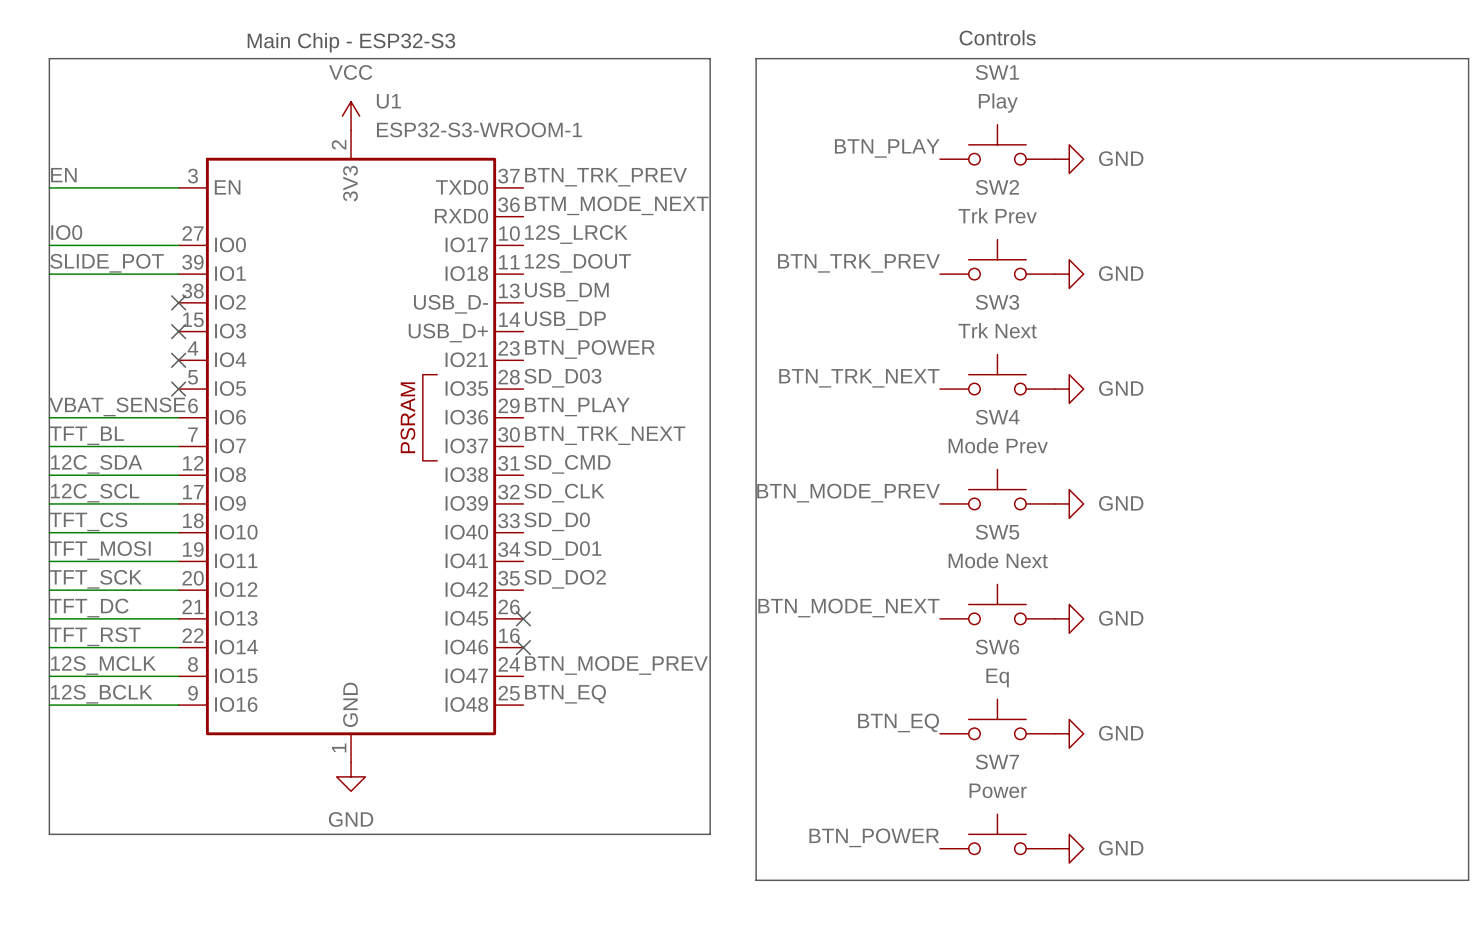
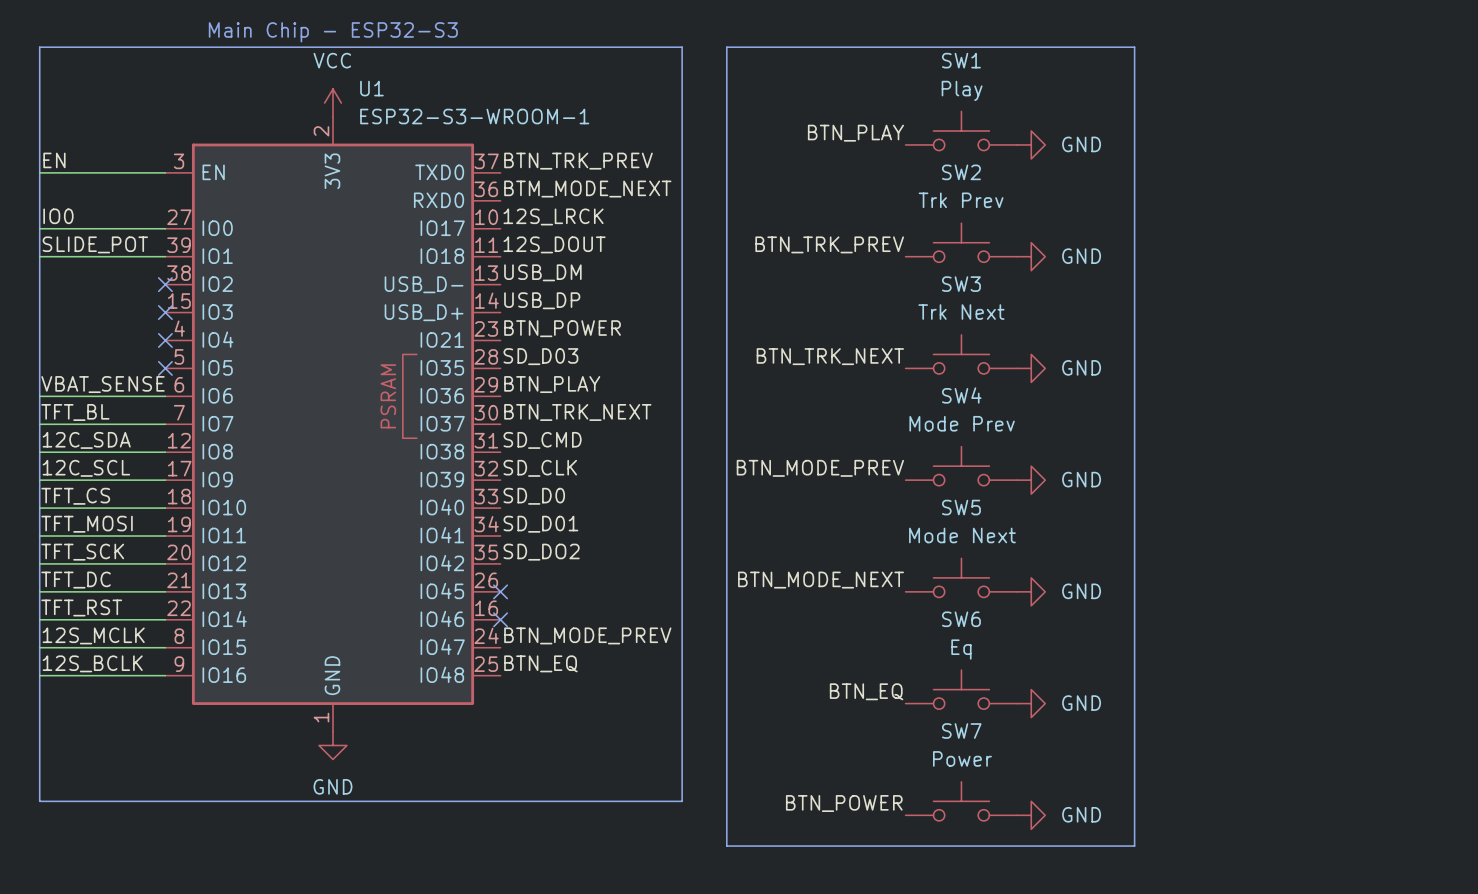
text: Controls (997, 37) -> none
line: (1175, 58) (1468, 58) (1468, 880) (1175, 880) -> (1134, 47) (1134, 846)

